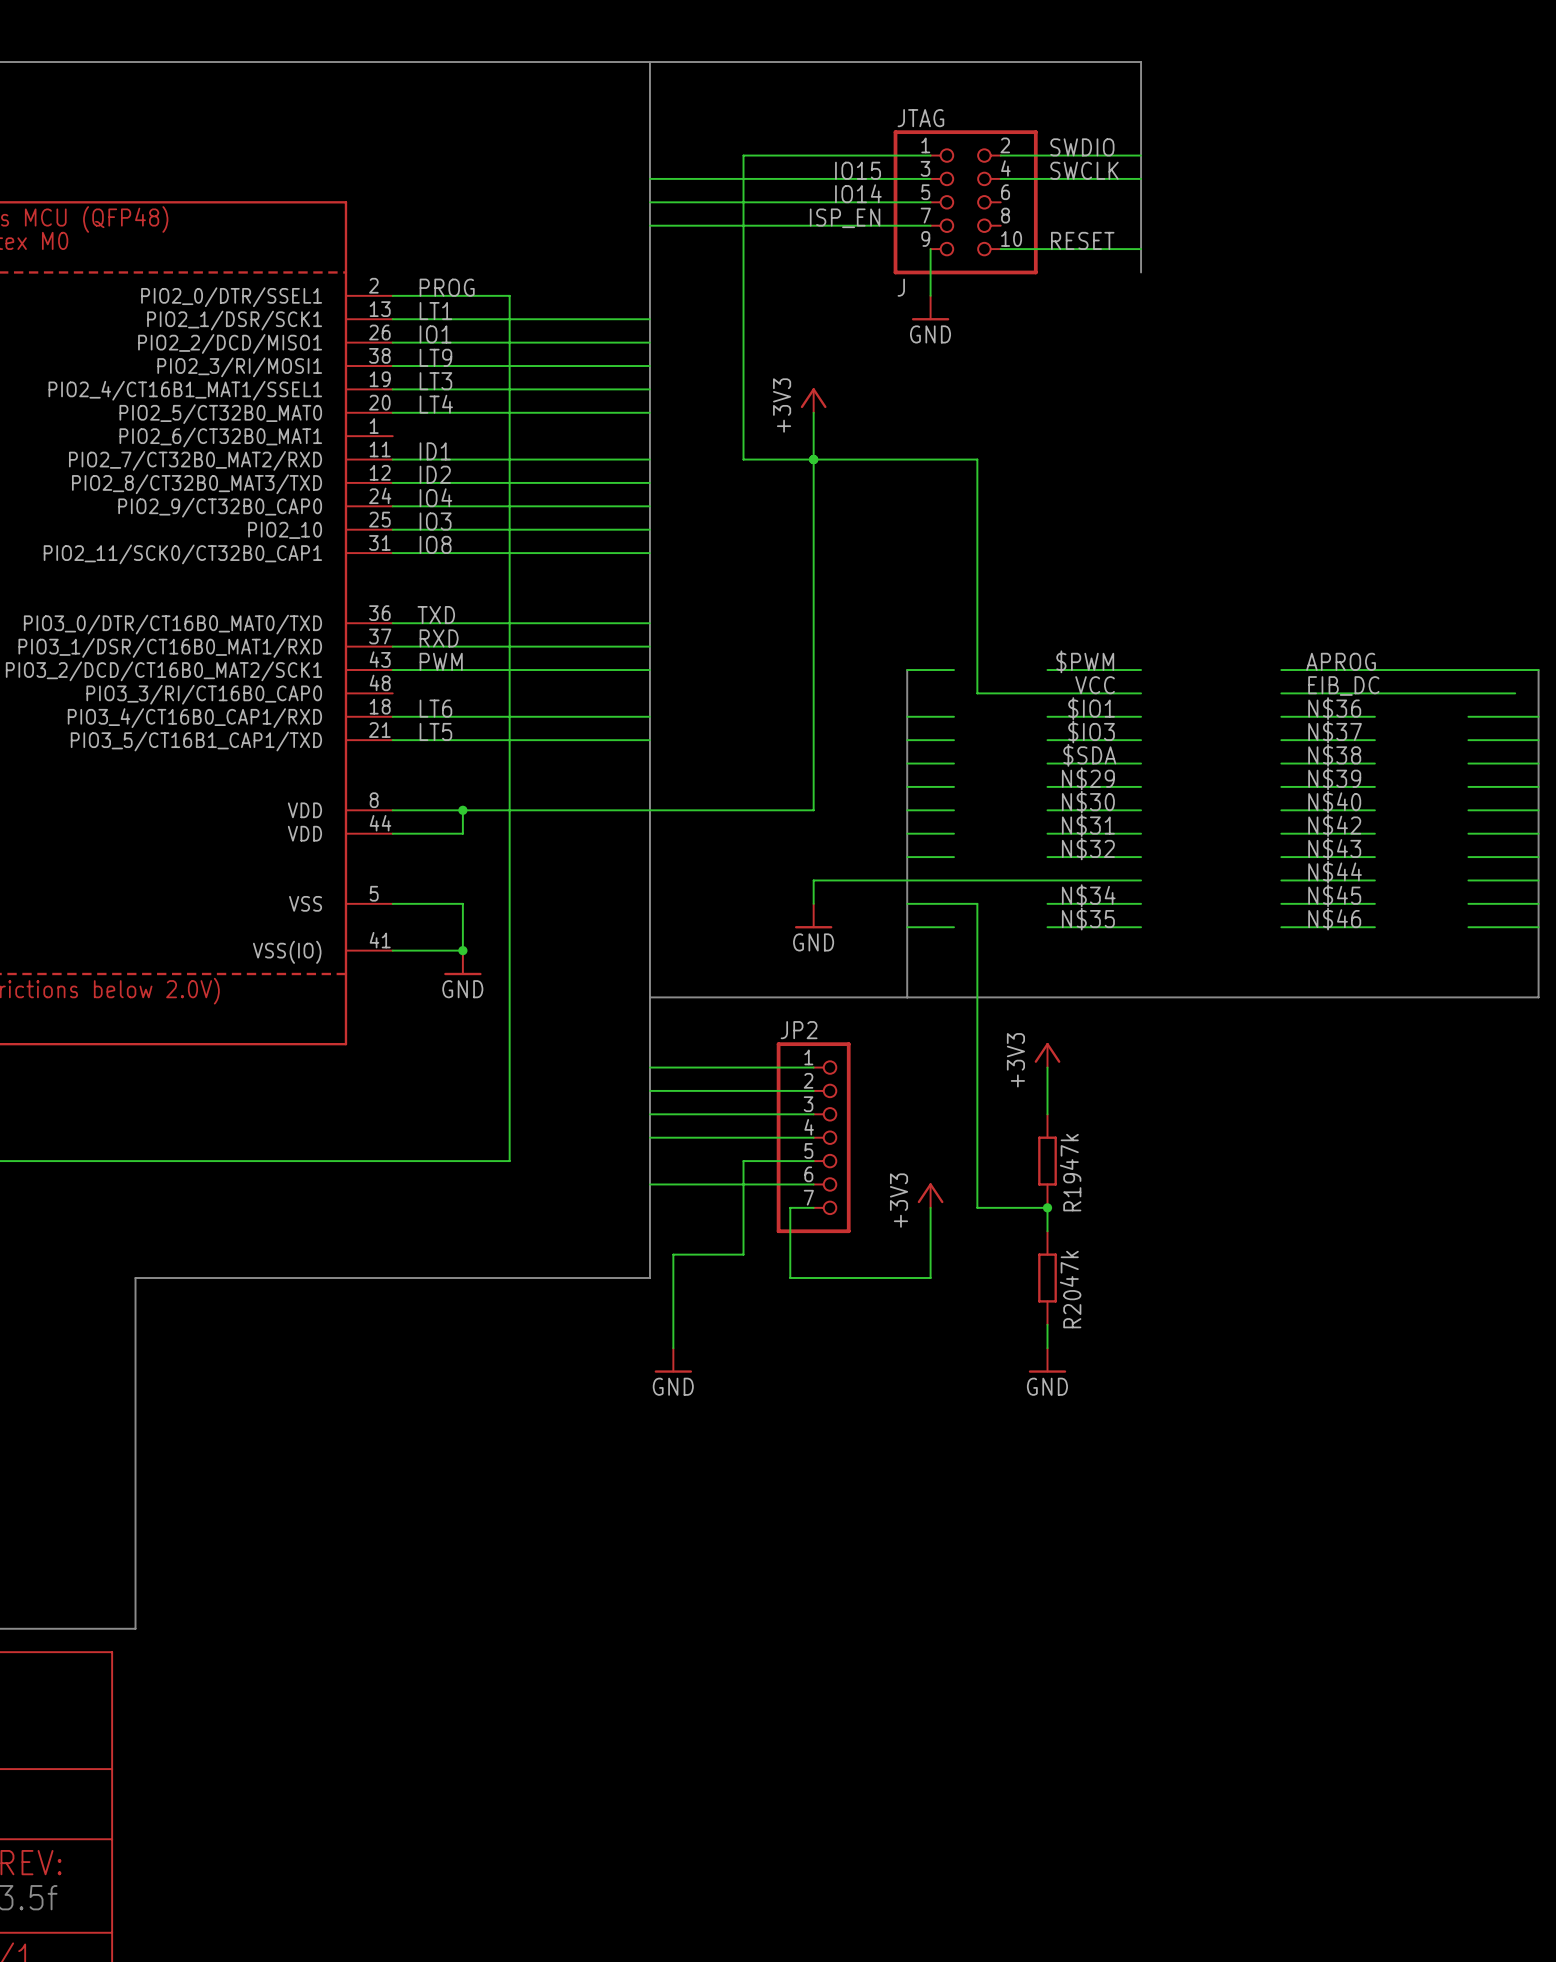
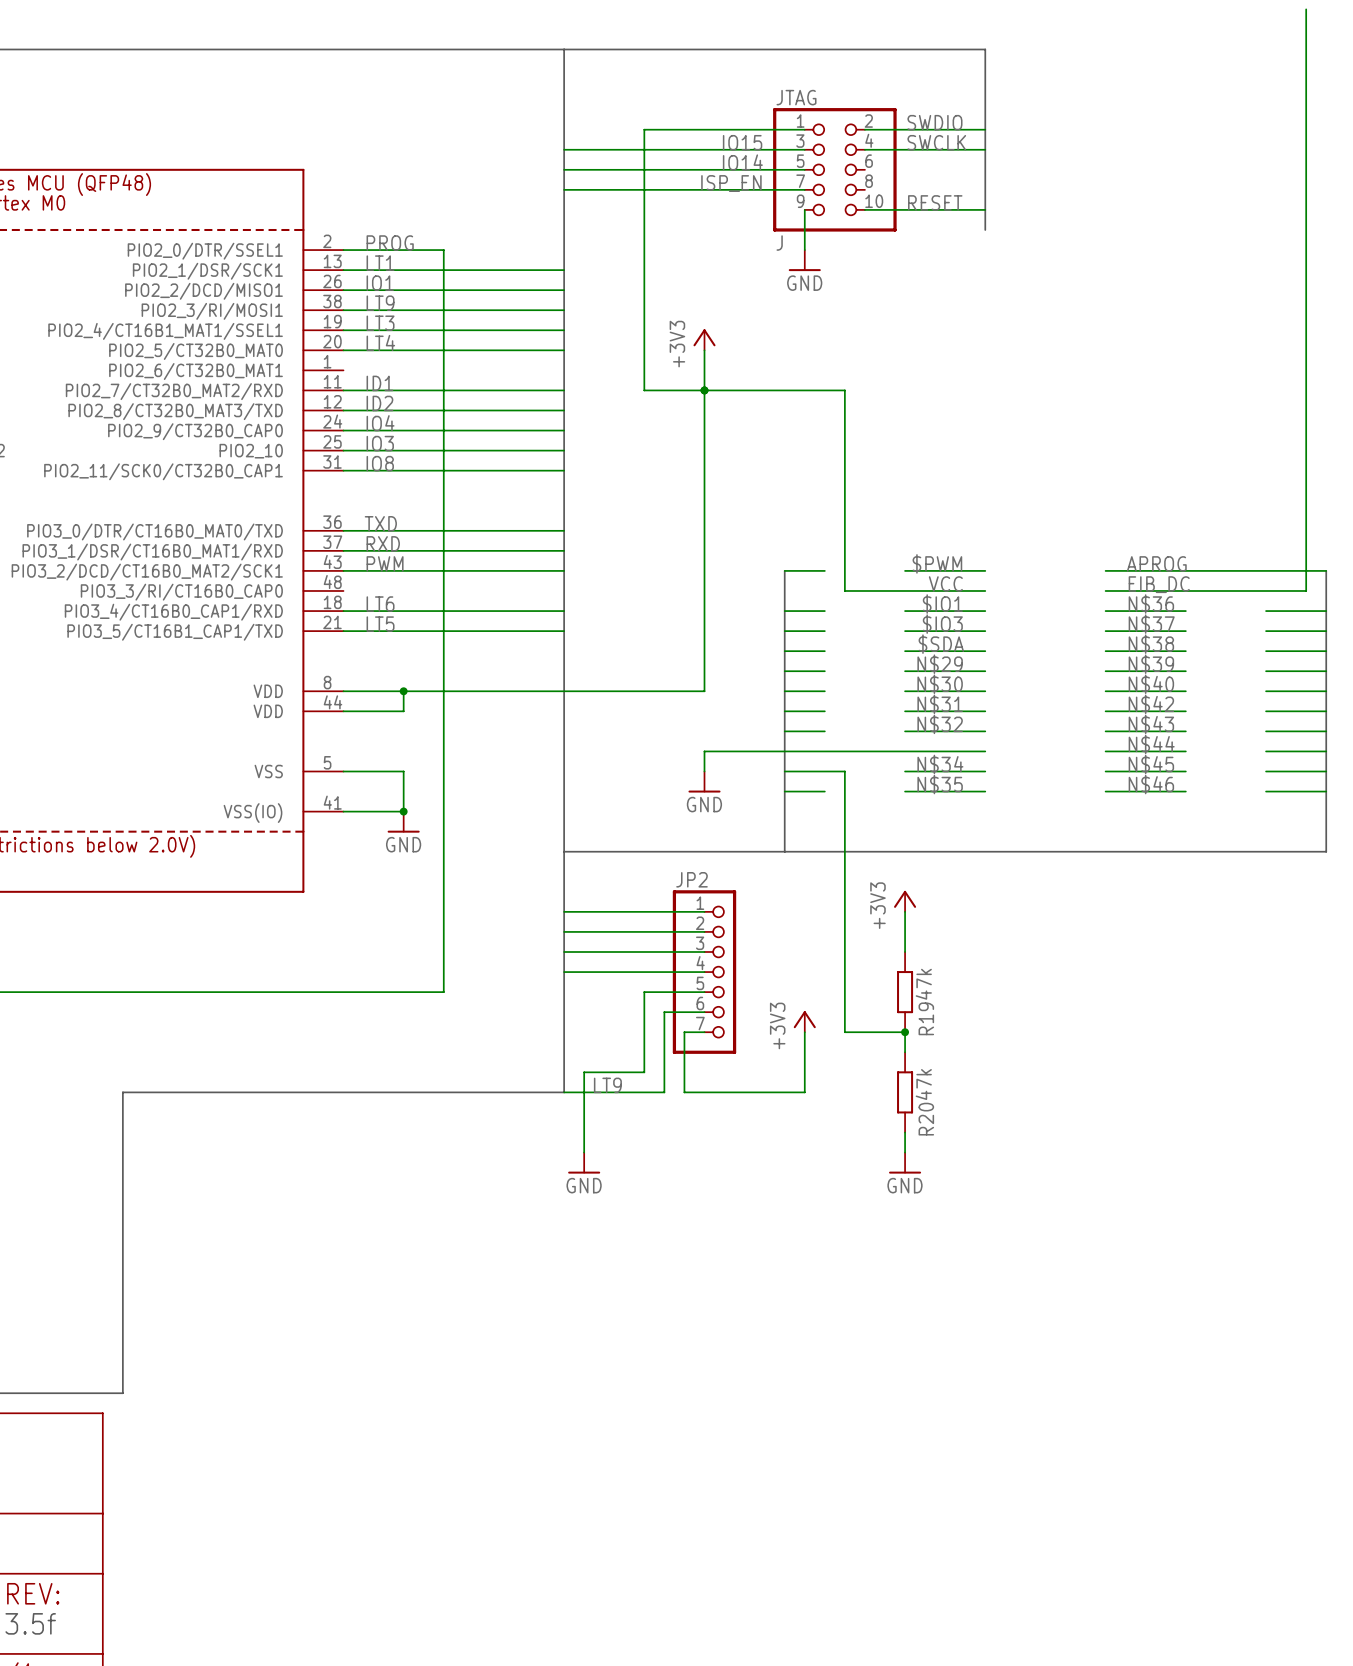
wire: none -> (1306, 9) (1306, 590)
wire: (649, 1184) (766, 1184) -> (564, 1092) (664, 1092) (664, 1012)
label: none -> LT9 (607, 1085)

